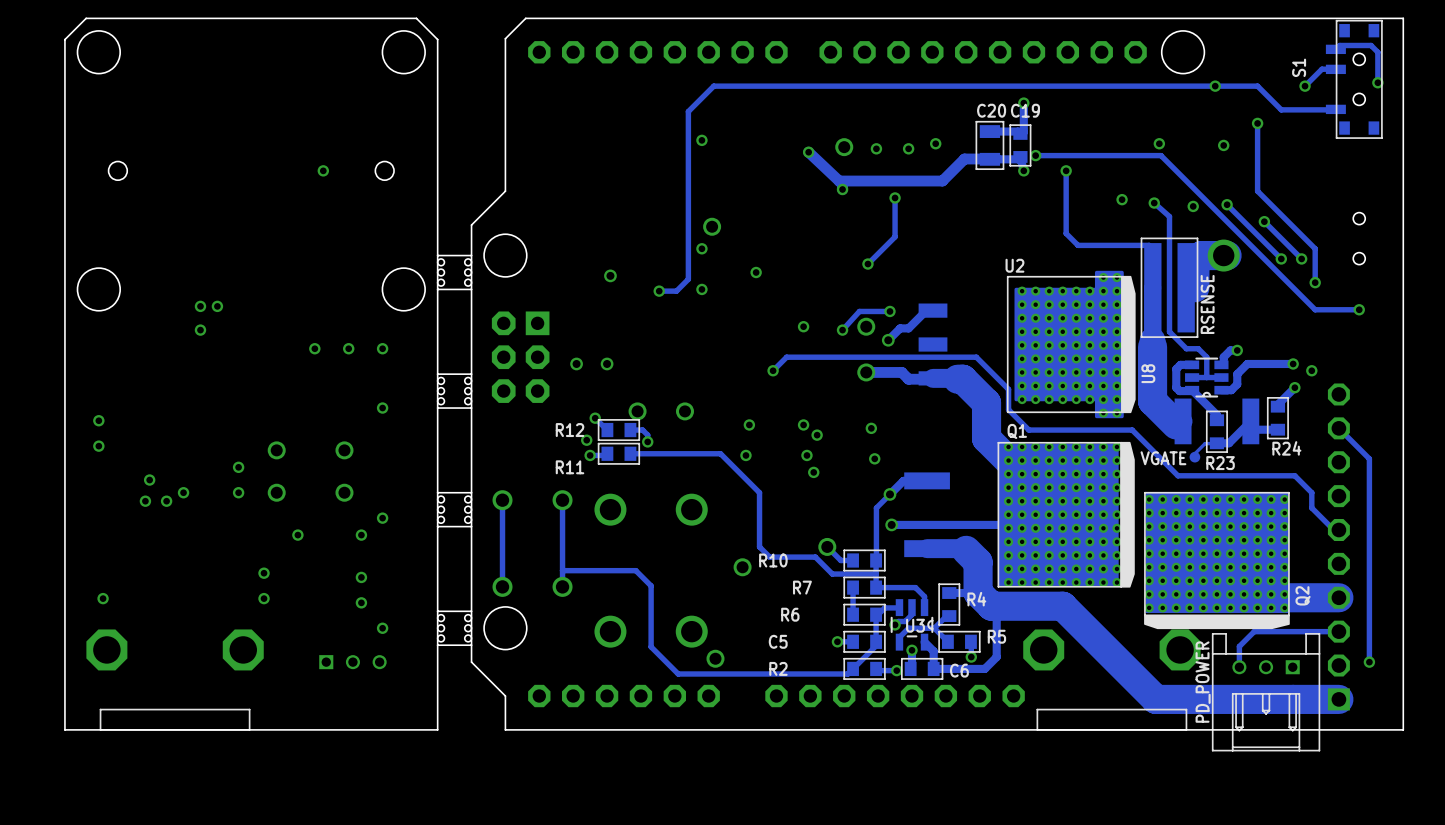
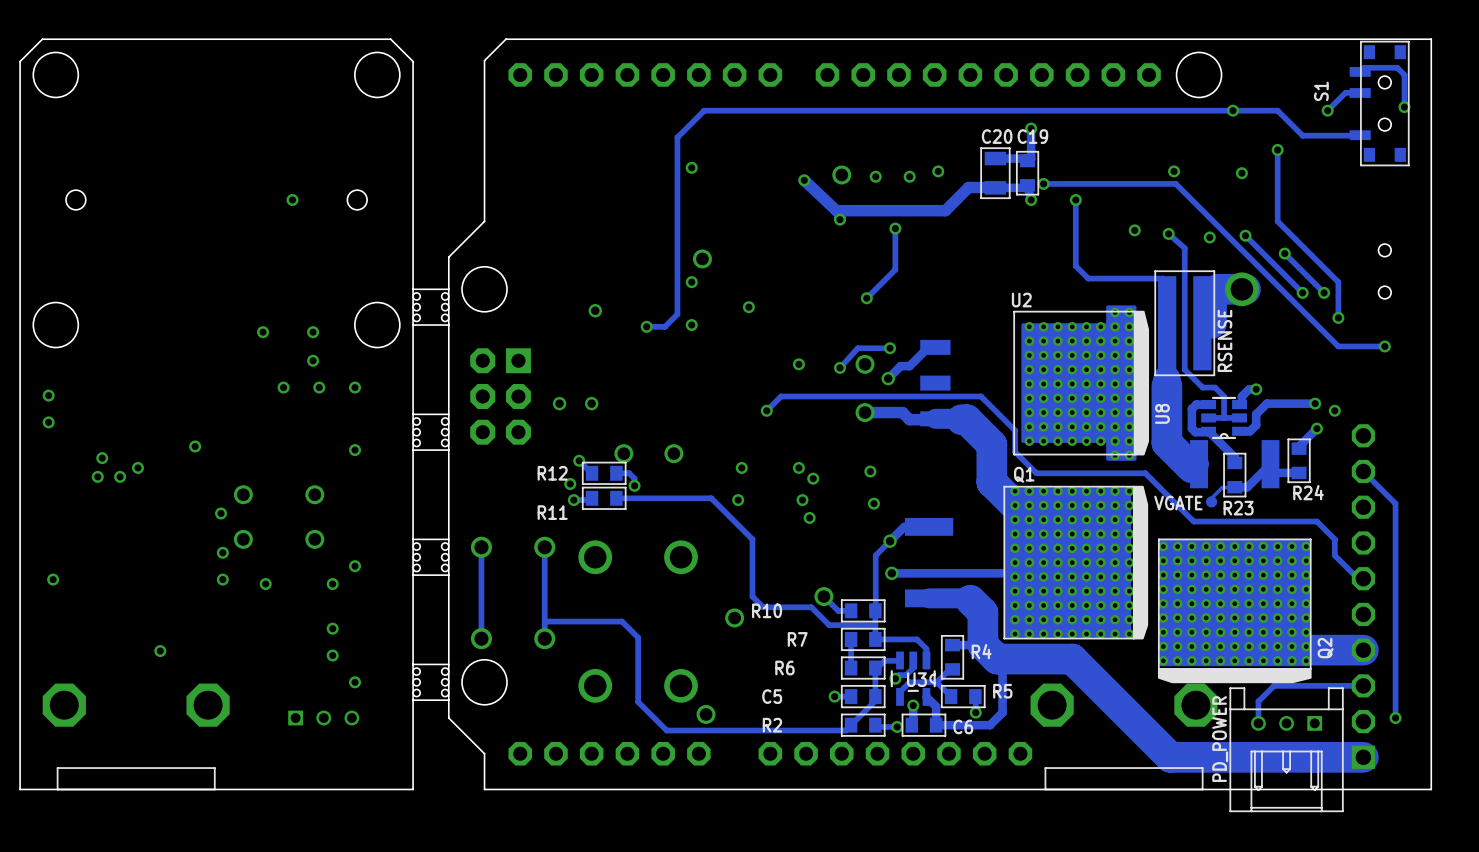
via: none -> (263, 332)
via: none -> (313, 332)
via: (200, 306) -> none
via: (217, 306) -> none
via: none -> (313, 360)
via: (200, 330) -> none
via: none -> (48, 395)
via: none -> (48, 422)
via: none -> (195, 446)
via: none -> (102, 458)
via: (98, 420) -> none
via: none -> (137, 467)
via: none -> (97, 476)
via: none -> (120, 476)
via: (98, 446) -> none
via: (238, 467) -> none
via: none -> (221, 513)
via: (149, 480) -> none
via: (183, 492) -> none
via: (238, 492) -> none
via: (145, 501) -> none
via: (166, 501) -> none
via: none -> (222, 552)
via: none -> (53, 579)
via: none -> (222, 579)
via: (264, 573) -> none
via: (103, 598) -> none
via: none -> (160, 651)
via: (264, 598) -> none

